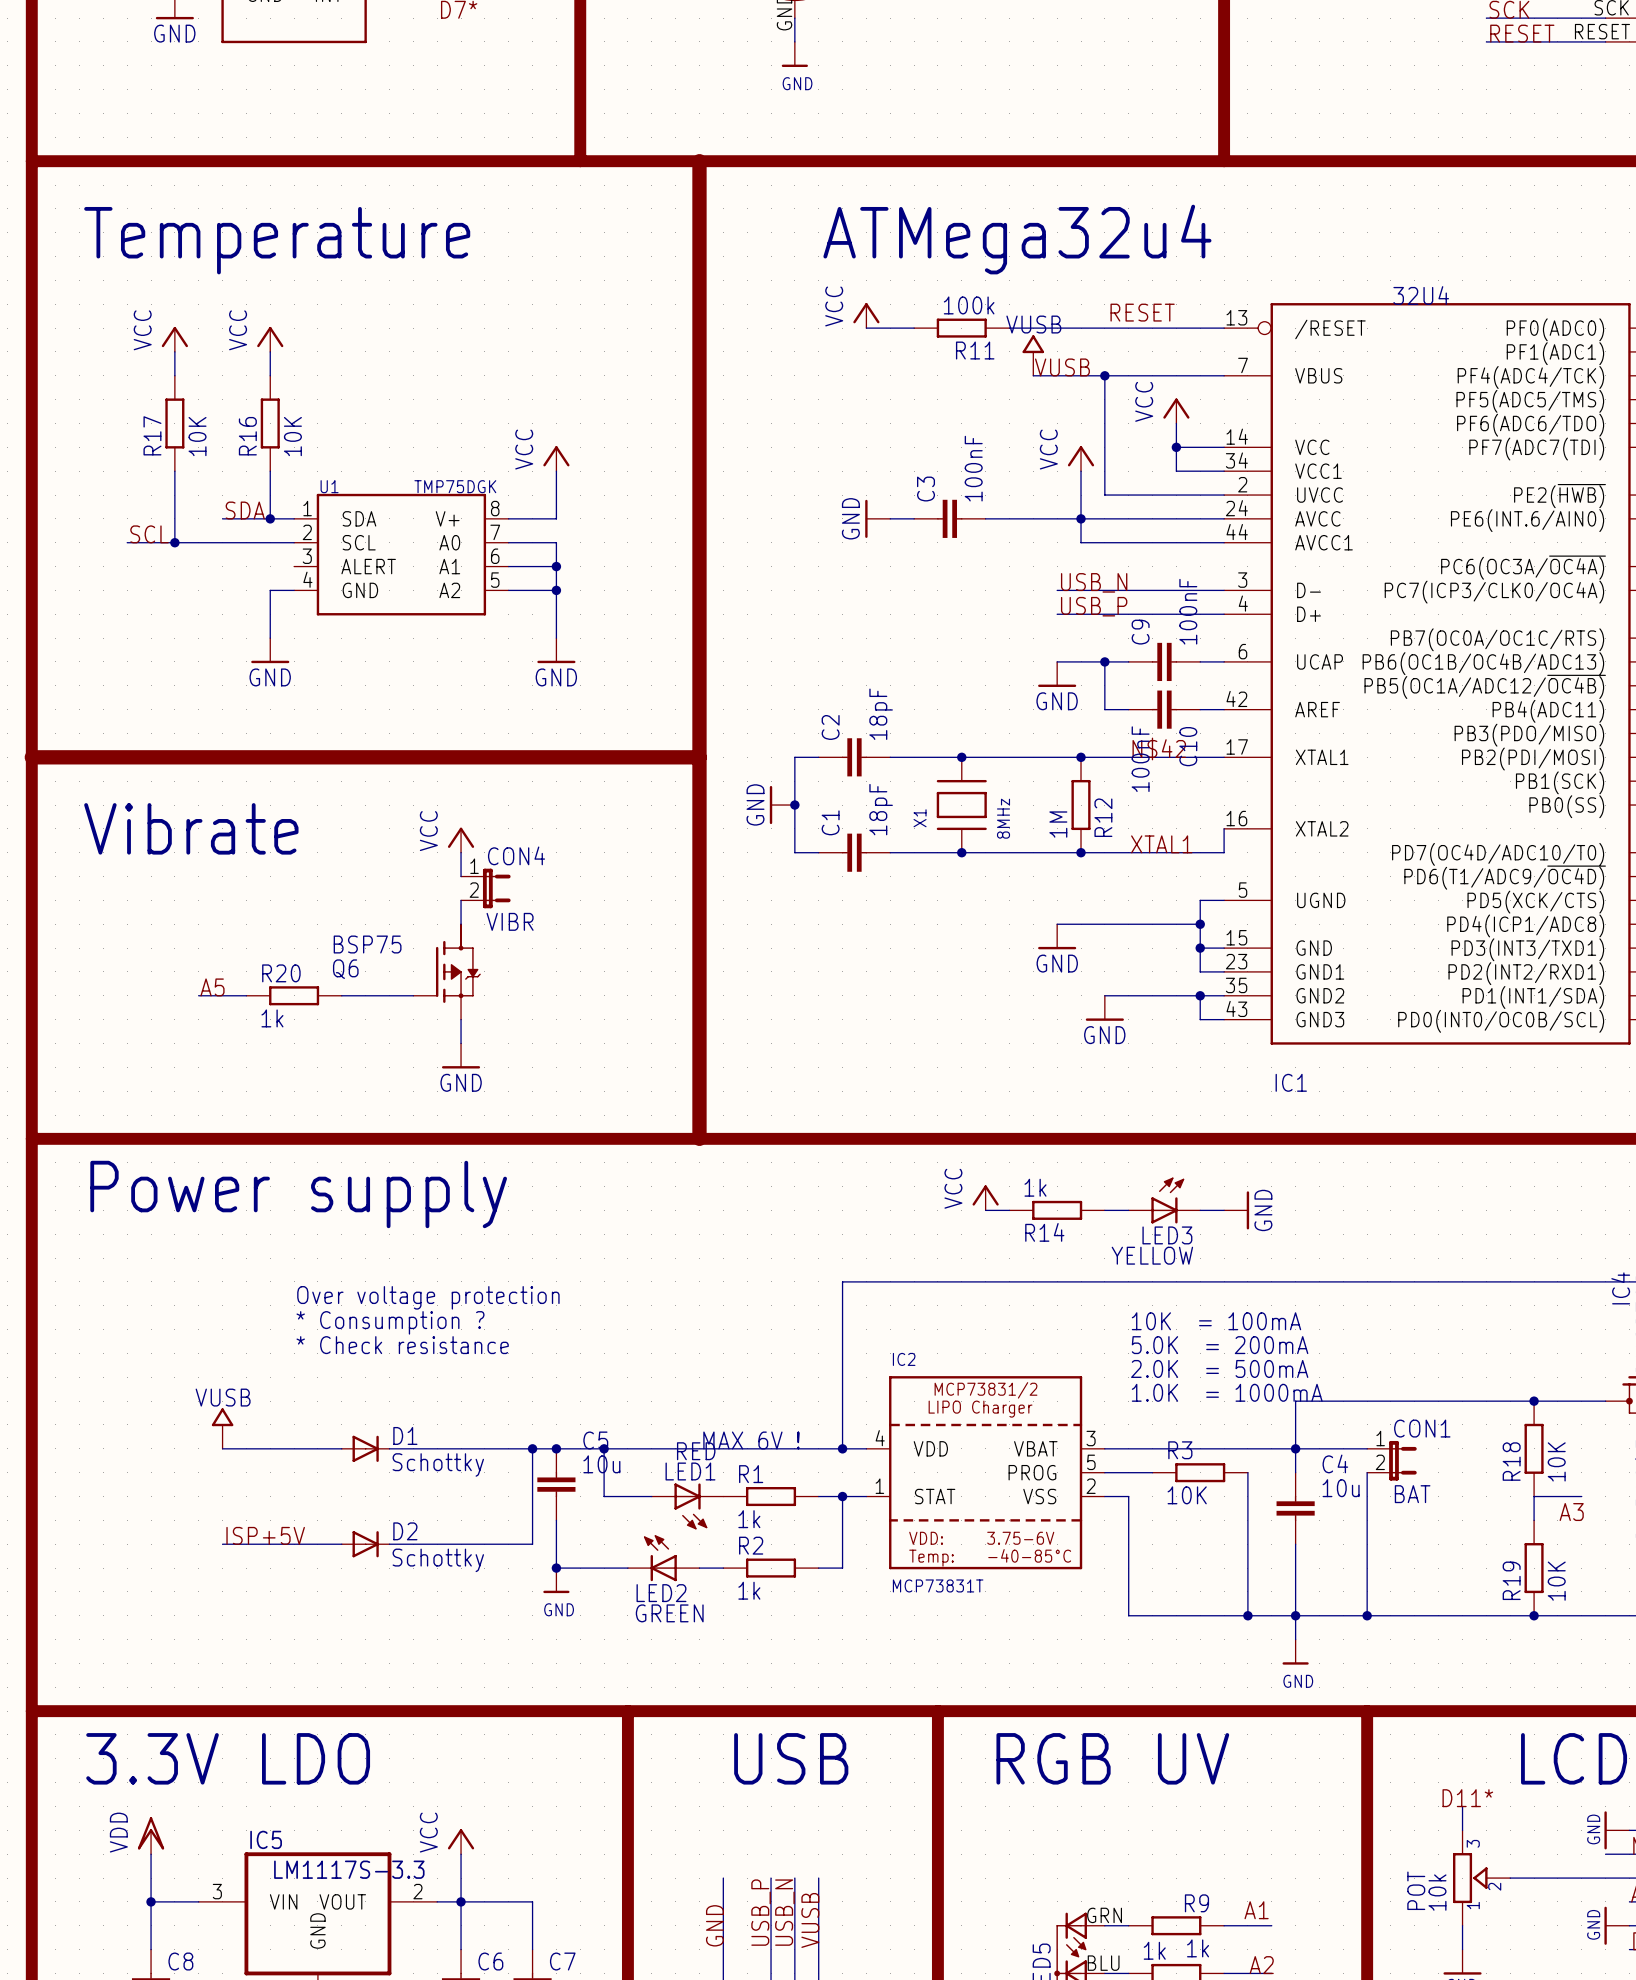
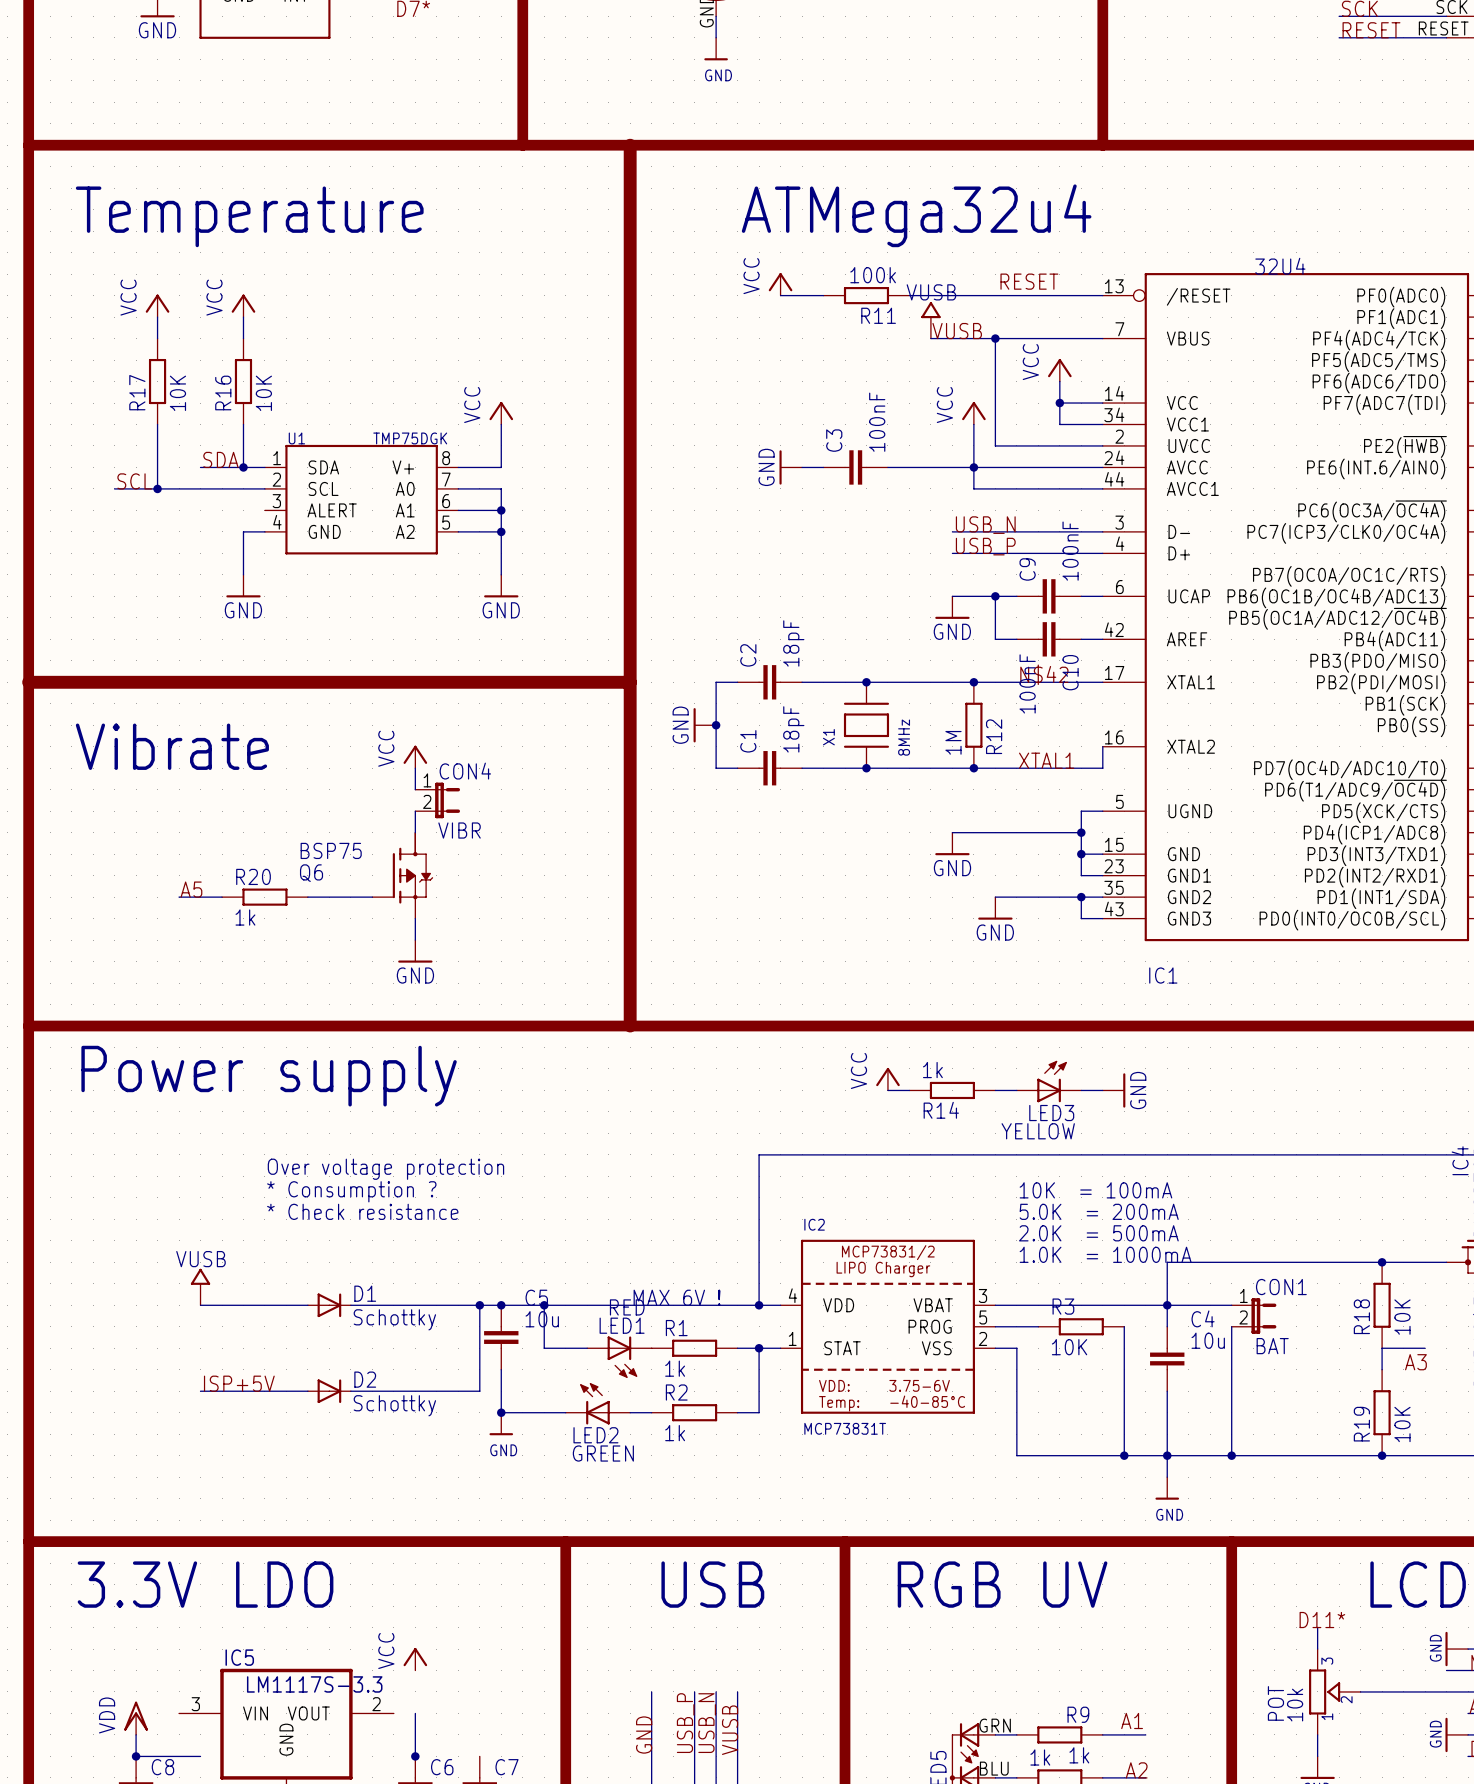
power symbol position: VDD (151, 1835) -> VDD (136, 1718)
wire: (151, 1854) (151, 1925) -> none
wire: (461, 1854) (461, 1901) -> none
wire: (151, 1901) (198, 1901) -> none
junction position: (151, 1901) -> (136, 1756)
wire: (437, 1901) (532, 1901) (532, 1949) -> none
junction position: (461, 1901) -> (415, 1756)
wire: none -> (136, 1756) (200, 1756)

